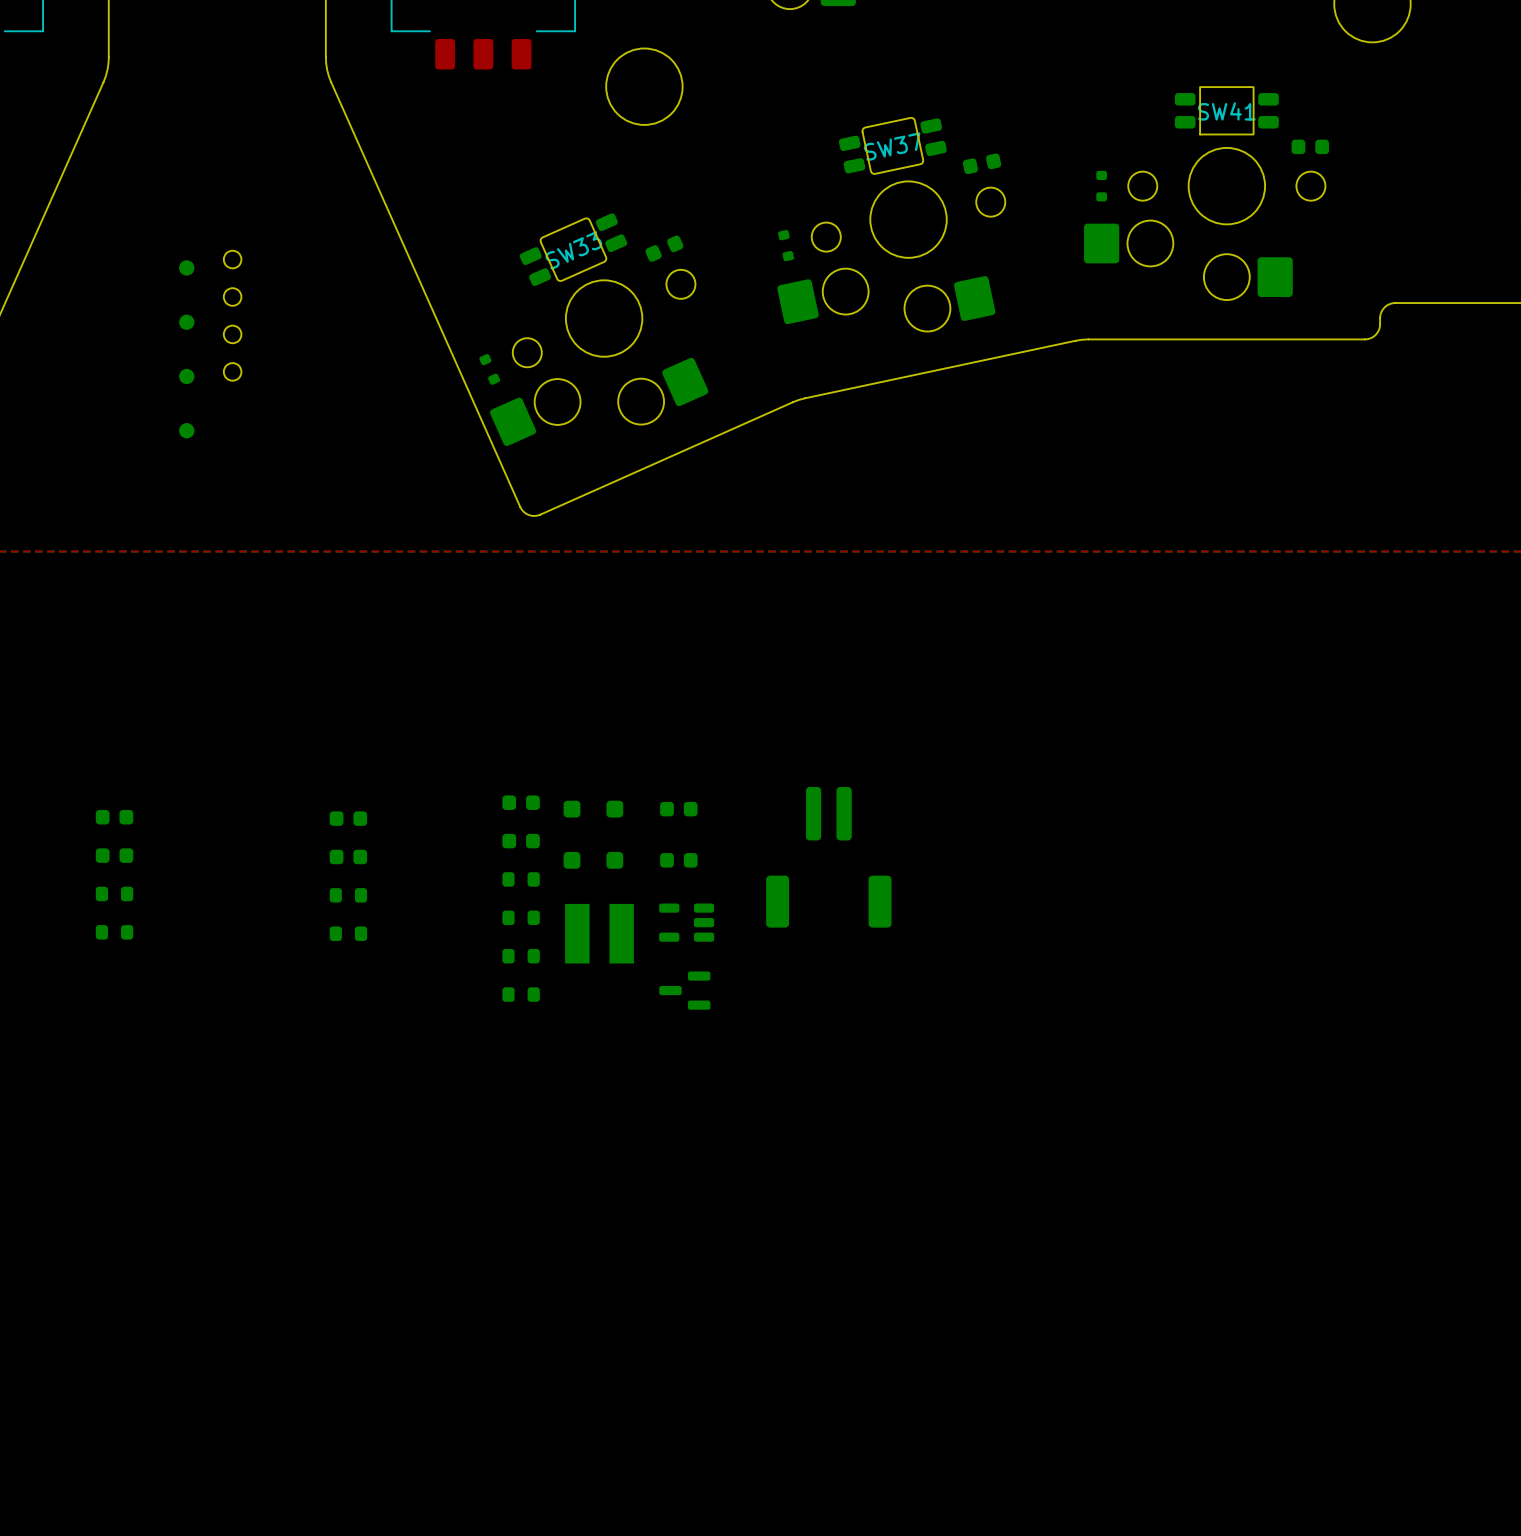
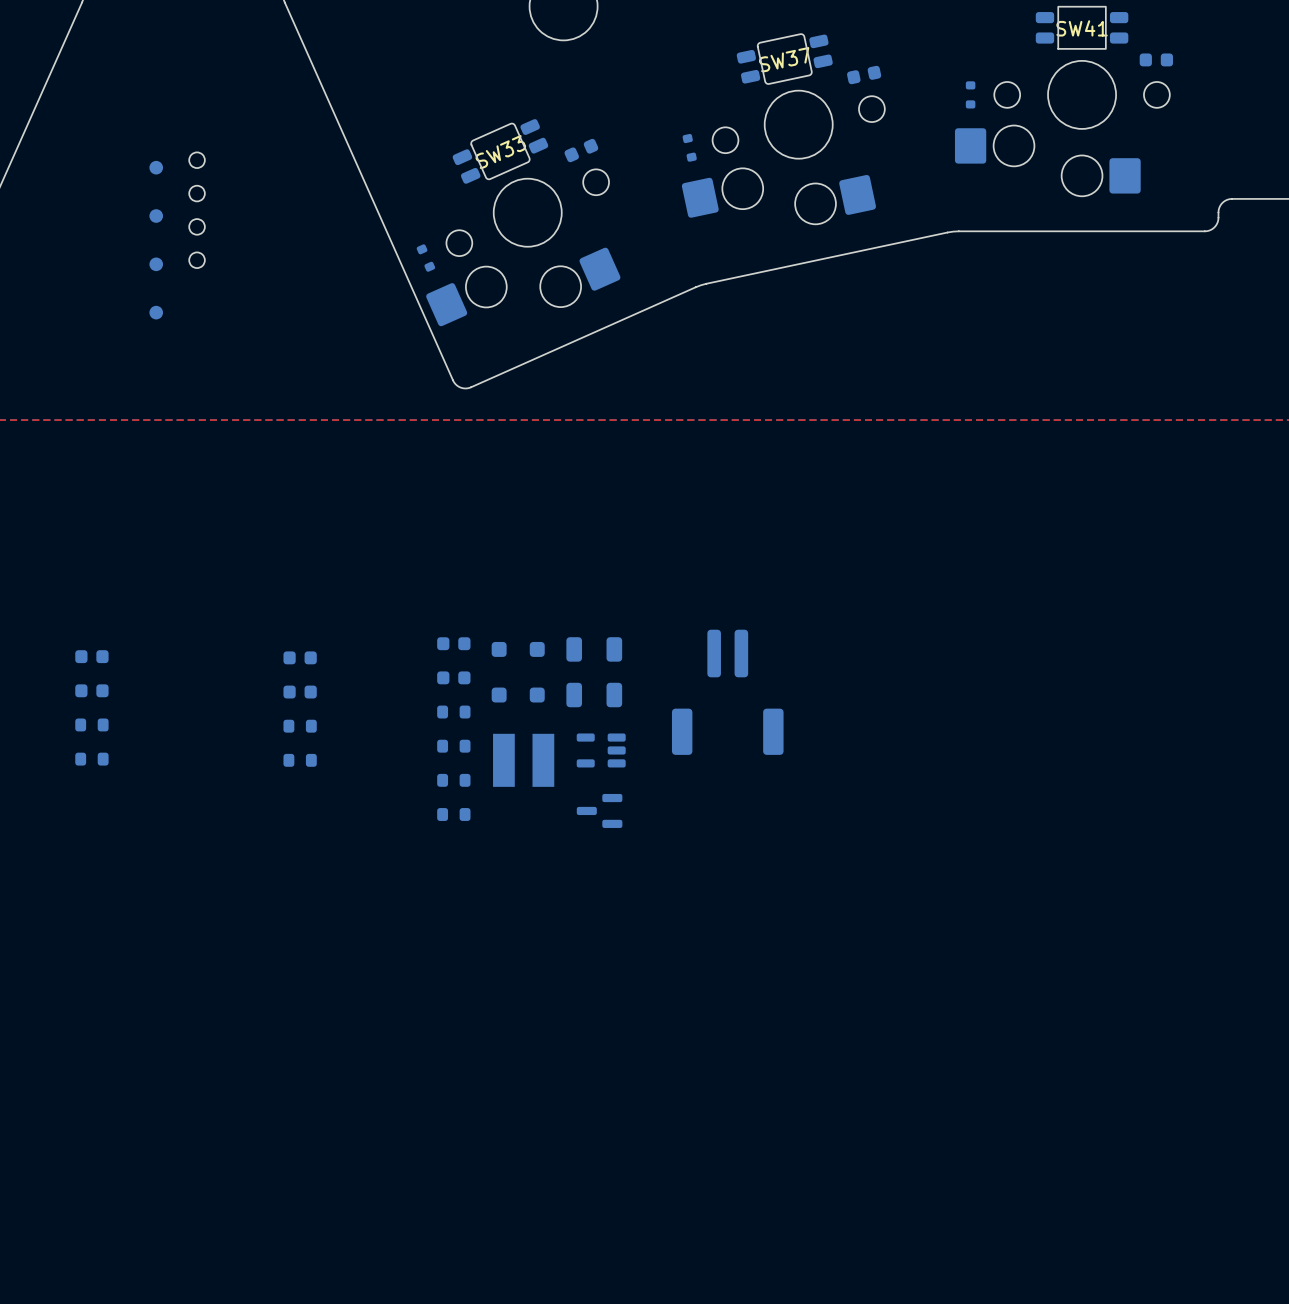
part footprint: [660, 801, 698, 817] -> [566, 637, 623, 662]
part footprint: [660, 853, 698, 868] -> [566, 682, 623, 708]

